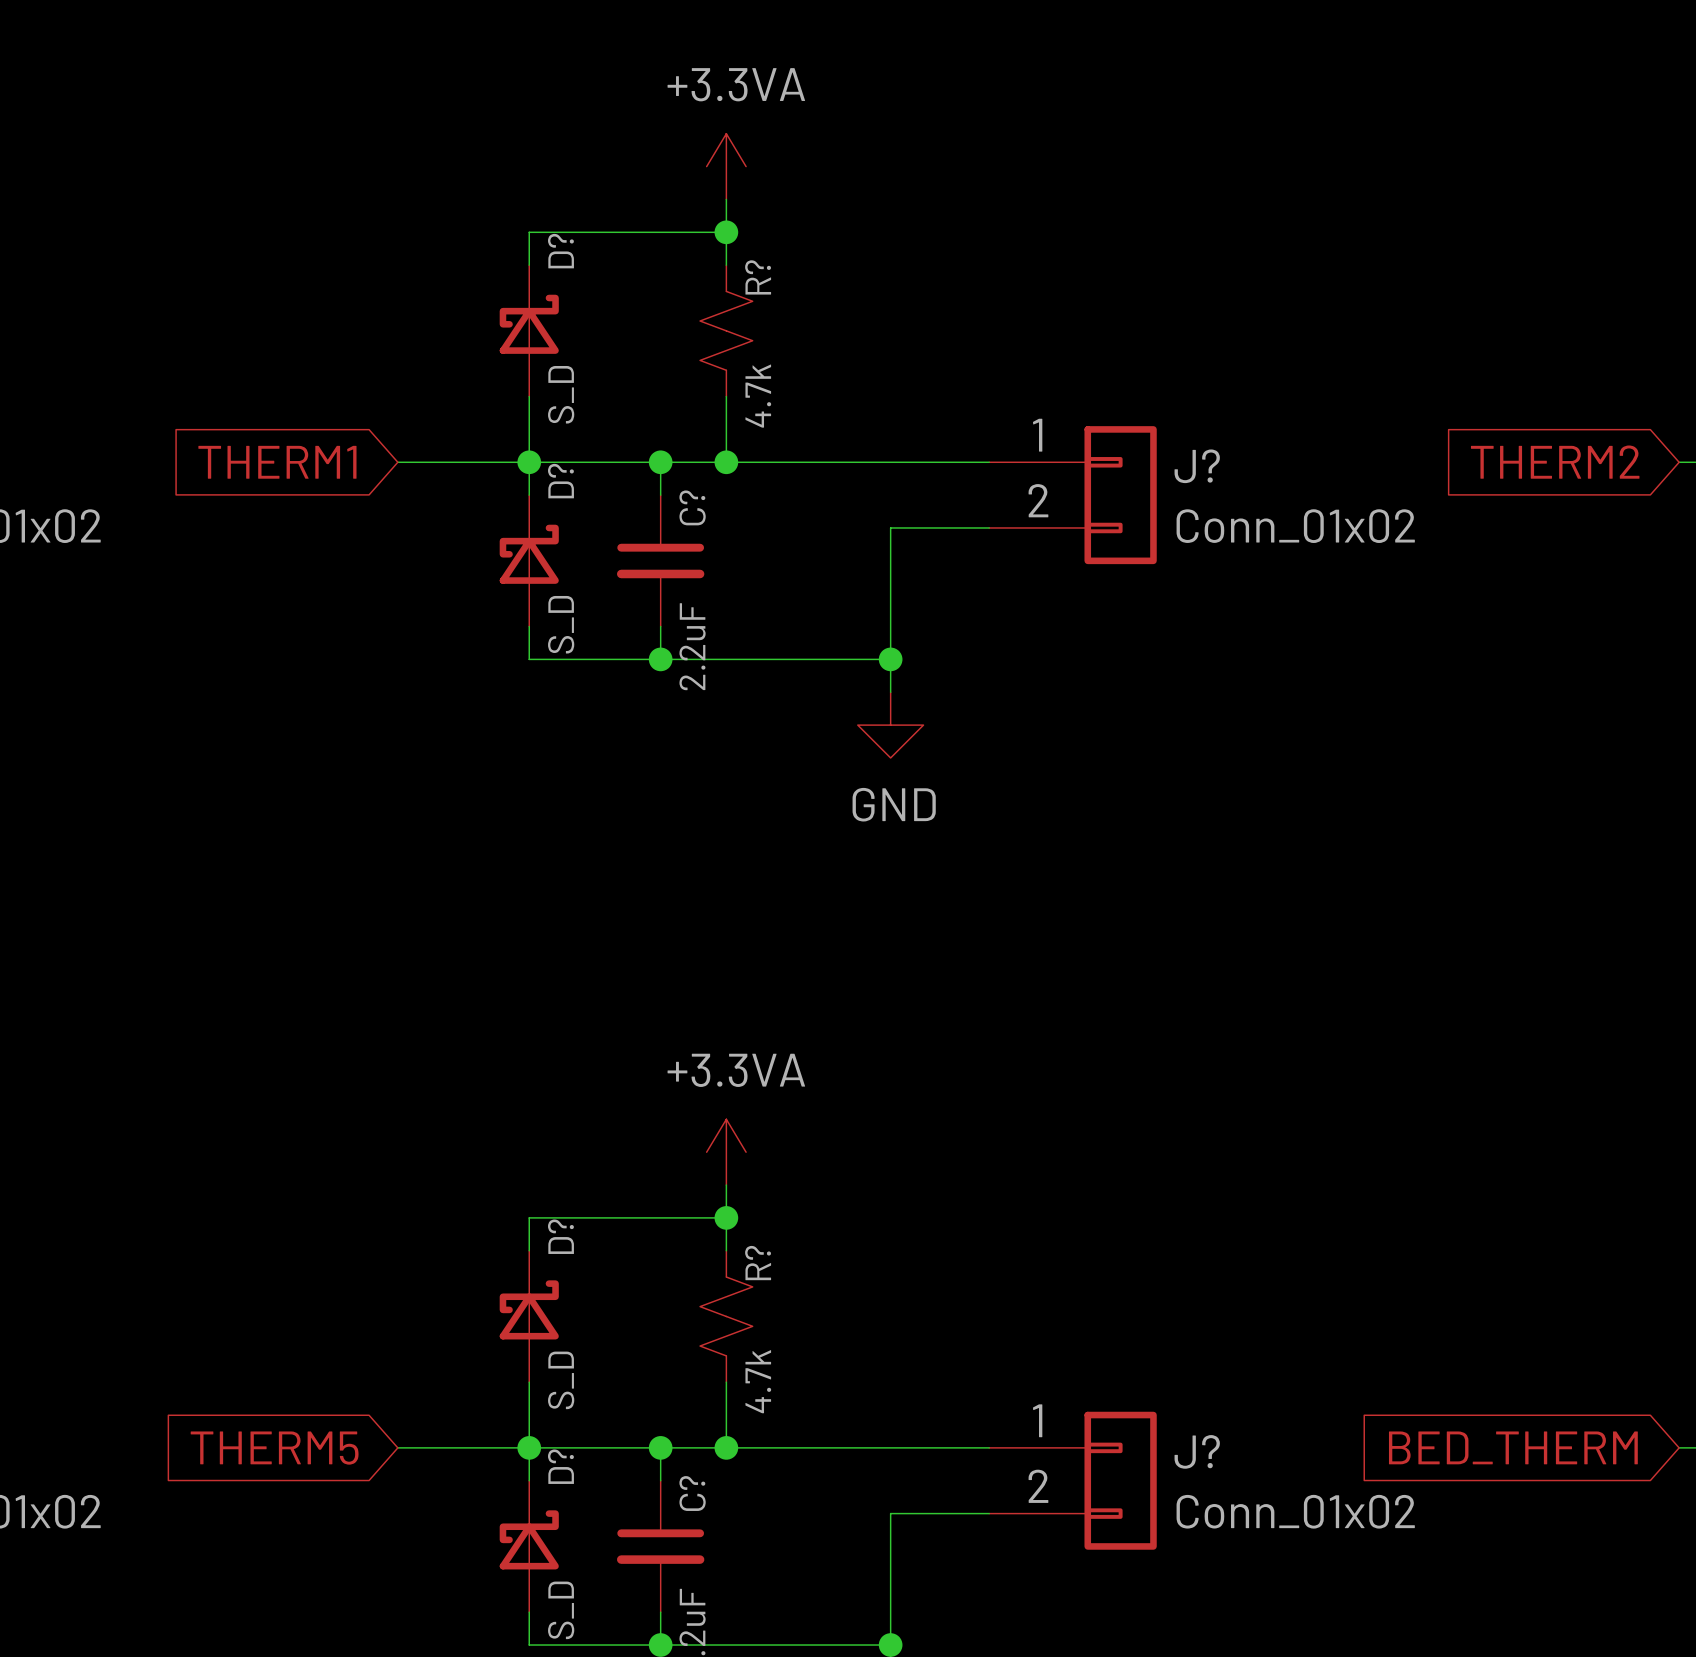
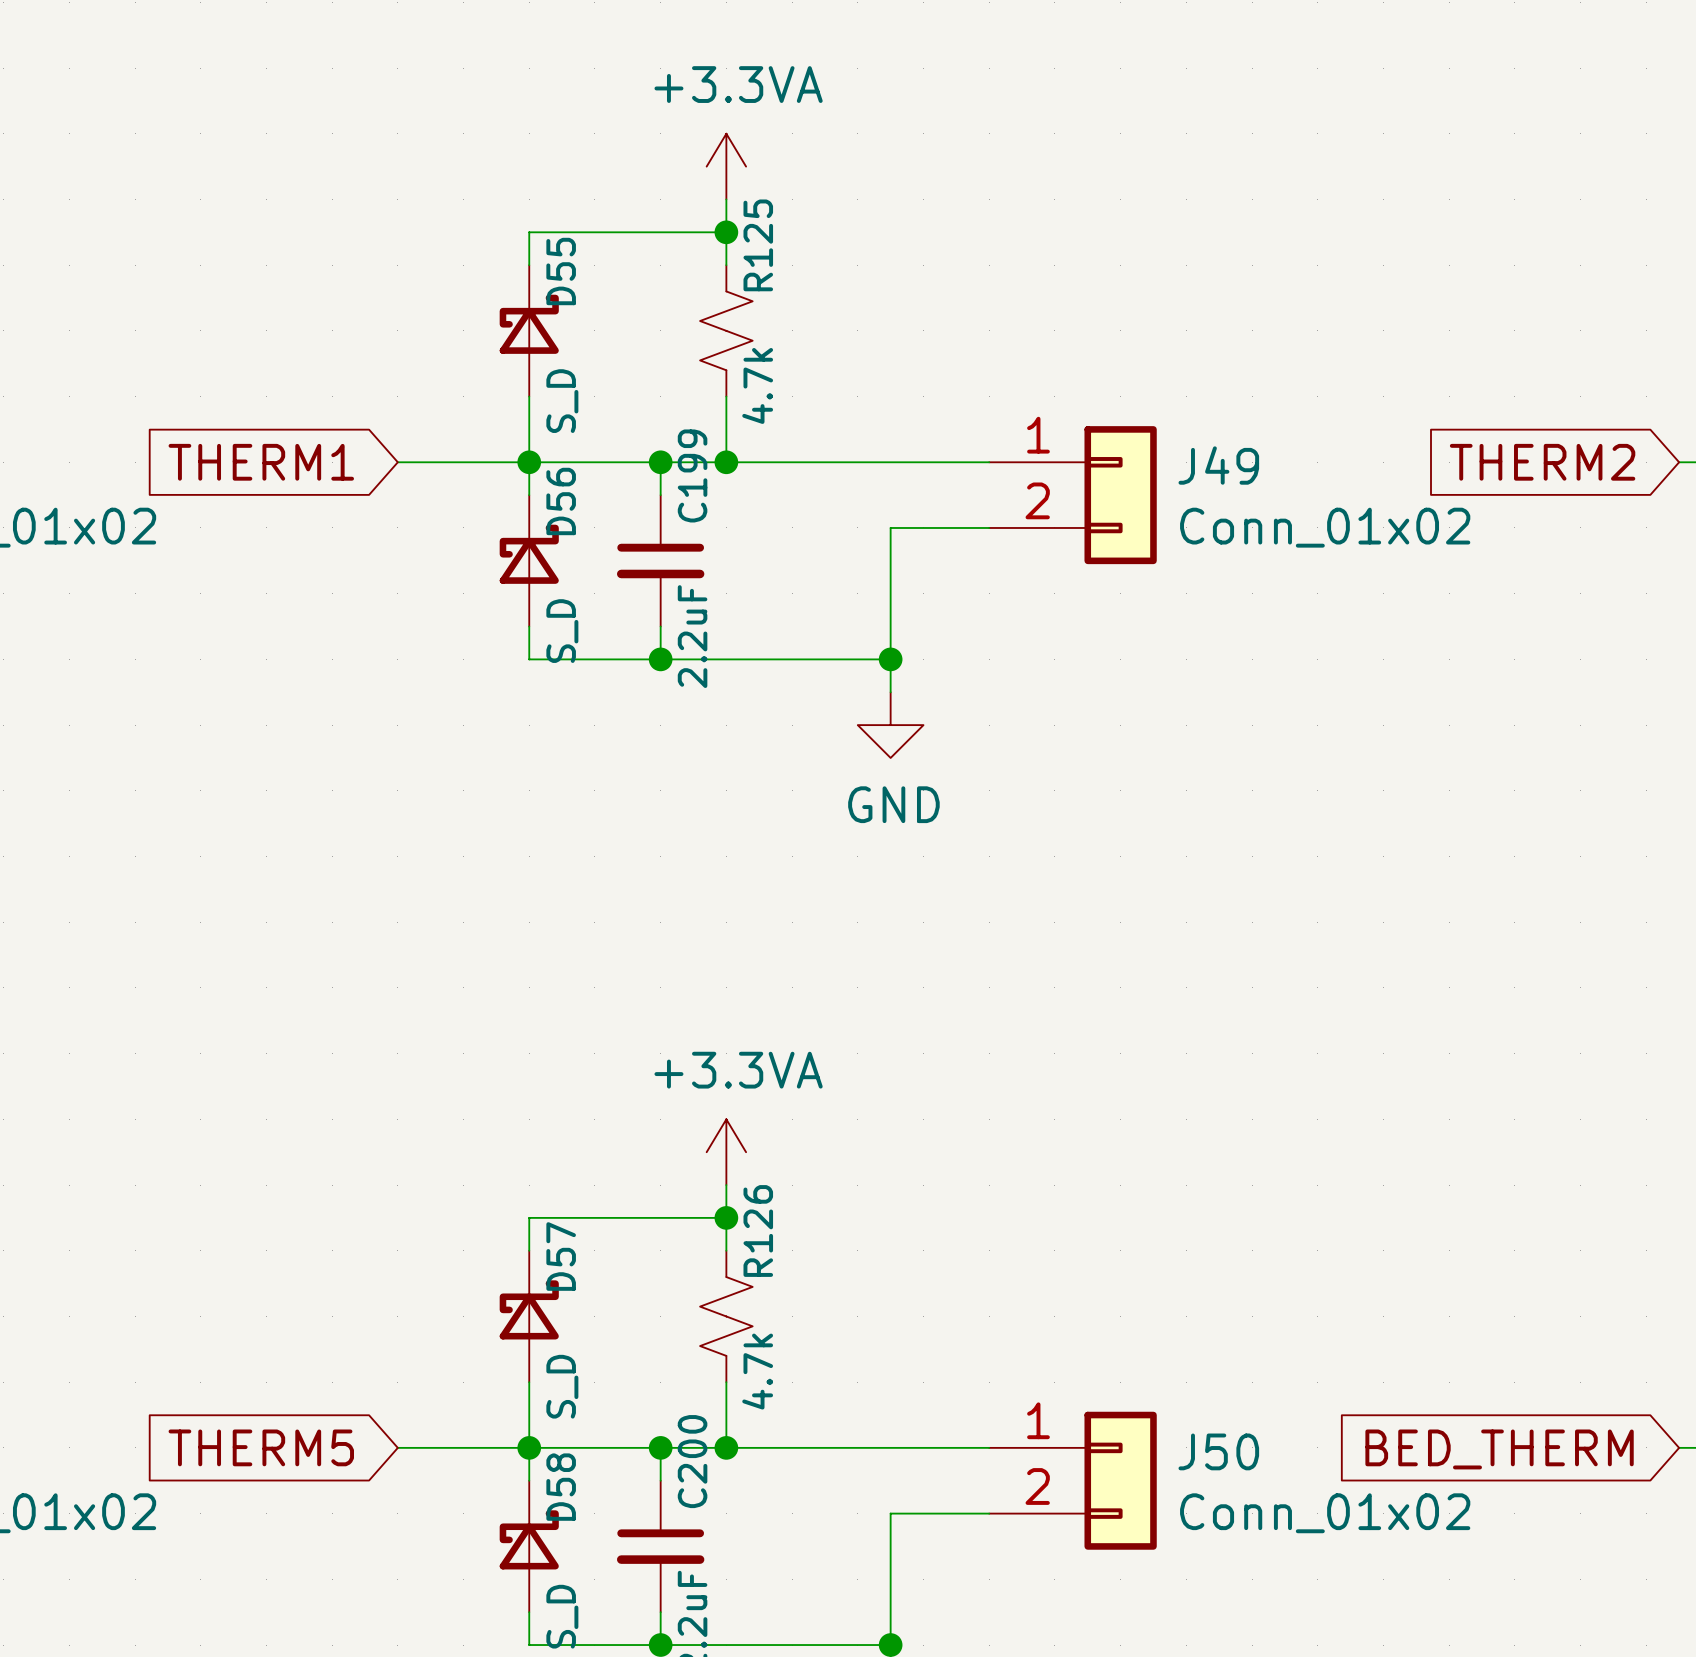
D? name: D? (560, 251) -> D55 (561, 271)
R? name: R? (758, 277) -> R125 (758, 245)
J? name: J? (1197, 466) -> J49 (1218, 465)
D? name: D? (560, 481) -> D56 (561, 501)
C? name: C? (692, 507) -> C199 (692, 475)
D? name: D? (560, 1236) -> D57 (561, 1256)
R? name: R? (758, 1263) -> R126 (758, 1230)
J? name: J? (1197, 1451) -> J50 (1218, 1451)
D? name: D? (560, 1466) -> D58 (561, 1487)
C? name: C? (692, 1493) -> C200 (692, 1461)

